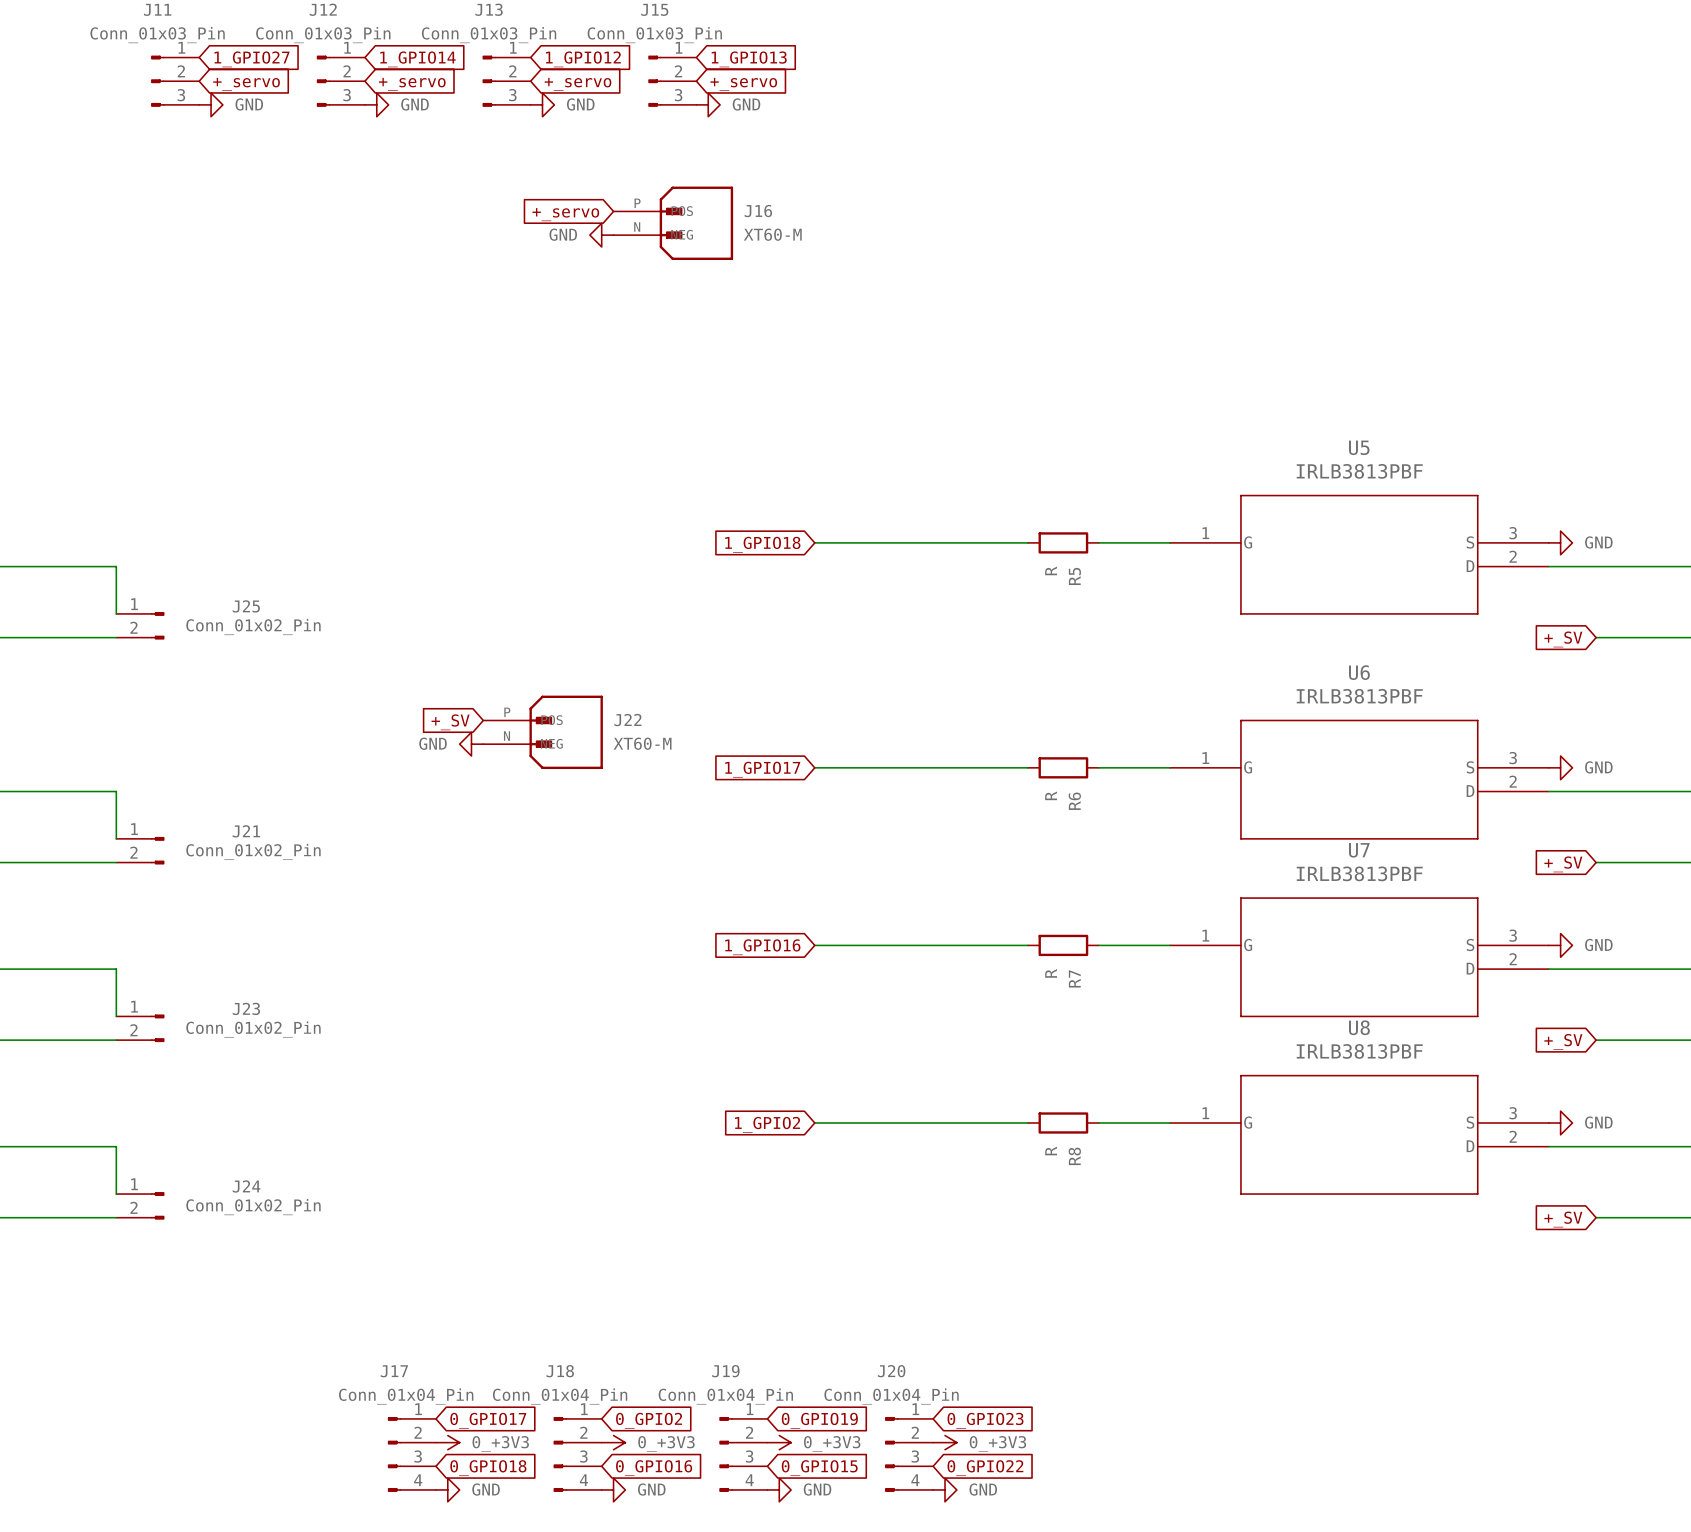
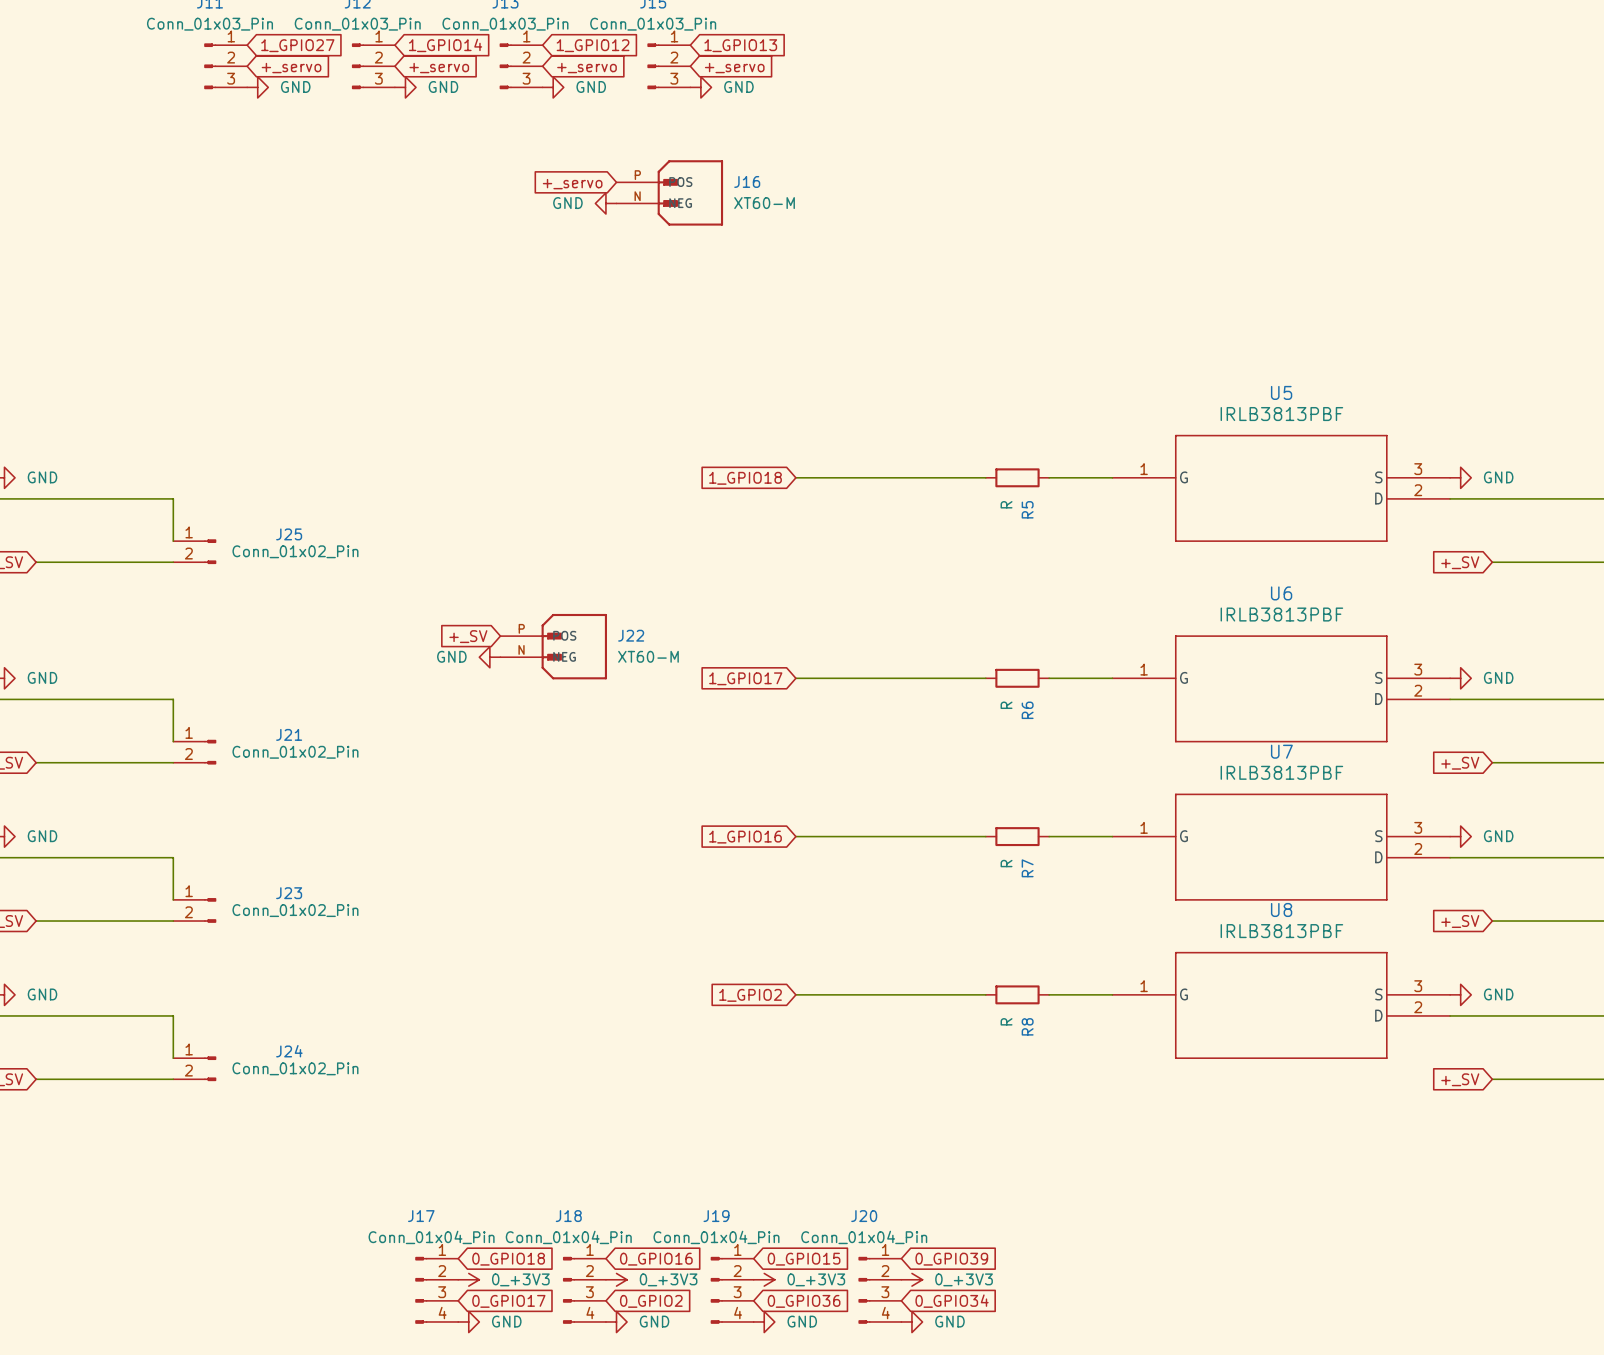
global label: 0_GPIO17 (488, 1420) -> 0_GPIO18 (508, 1259)
global label: 0_GPIO2 (649, 1420) -> 0_GPIO16 (656, 1259)
global label: 0_GPIO19 (819, 1420) -> 0_GPIO15 (804, 1259)
global label: 0_GPIO23 (985, 1420) -> 0_GPIO39 (951, 1259)
global label: 0_GPIO18 (488, 1468) -> 0_GPIO17 (508, 1301)
global label: 0_GPIO16 (654, 1468) -> 0_GPIO2 (651, 1301)
global label: 0_GPIO15 (819, 1468) -> 0_GPIO36 (804, 1301)
global label: 0_GPIO22 (985, 1468) -> 0_GPIO34 (952, 1301)

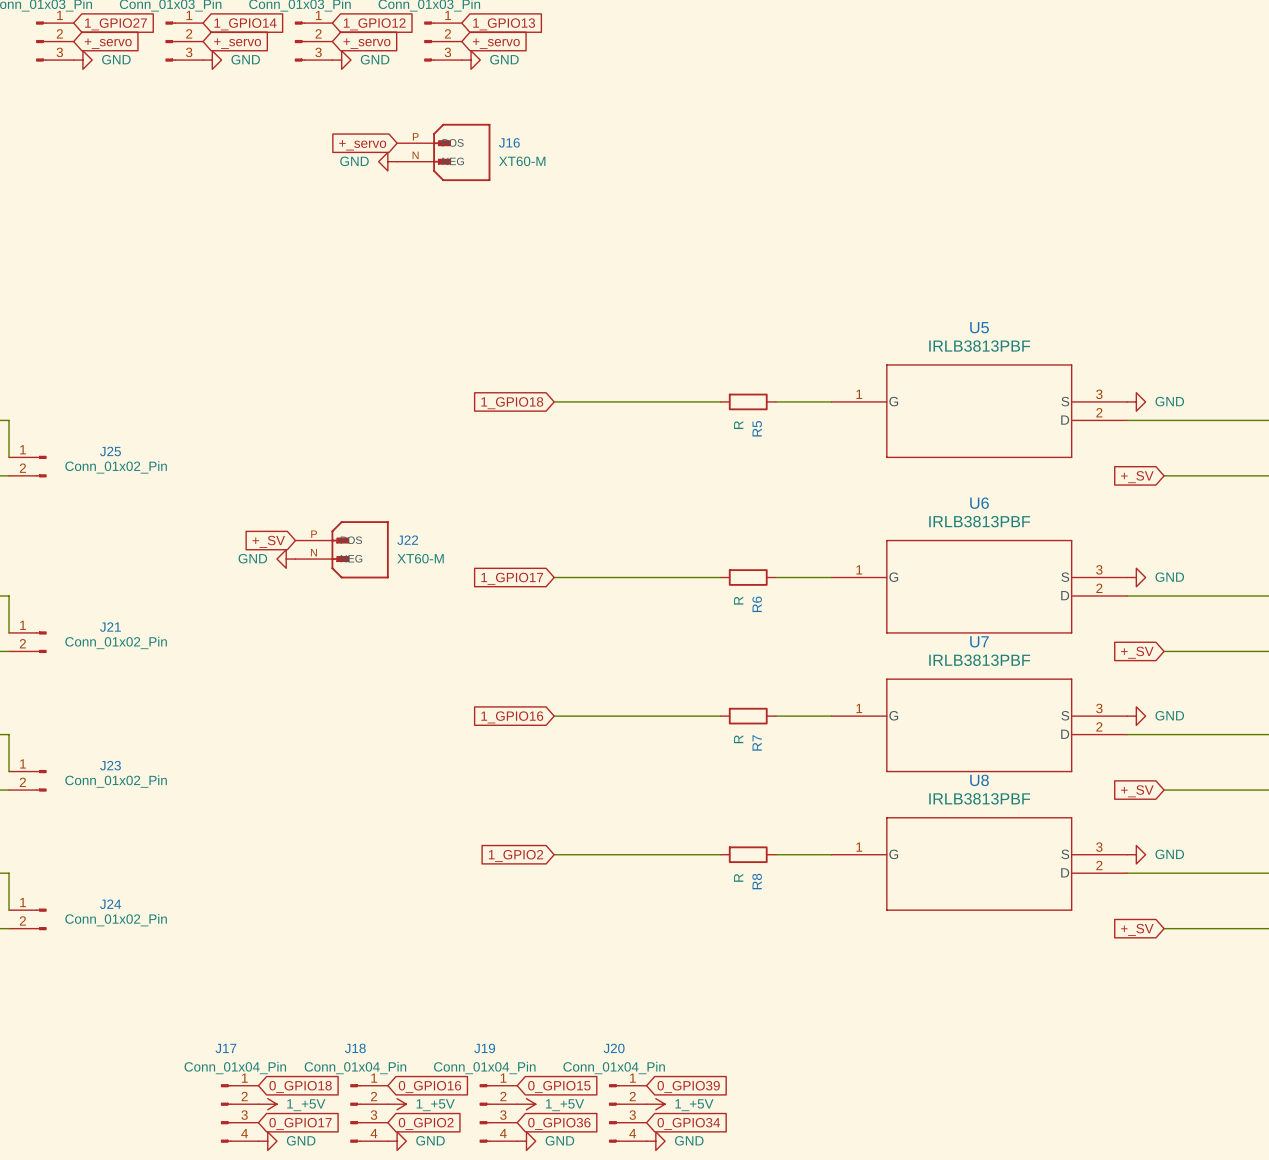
power symbol: 0_+3V3 (468, 1279) -> 1_+5V (267, 1104)
power symbol: 0_+3V3 (616, 1279) -> 1_+5V (397, 1104)
power symbol: 0_+3V3 (764, 1279) -> 1_+5V (526, 1104)
power symbol: 0_+3V3 (911, 1279) -> 1_+5V (655, 1104)

